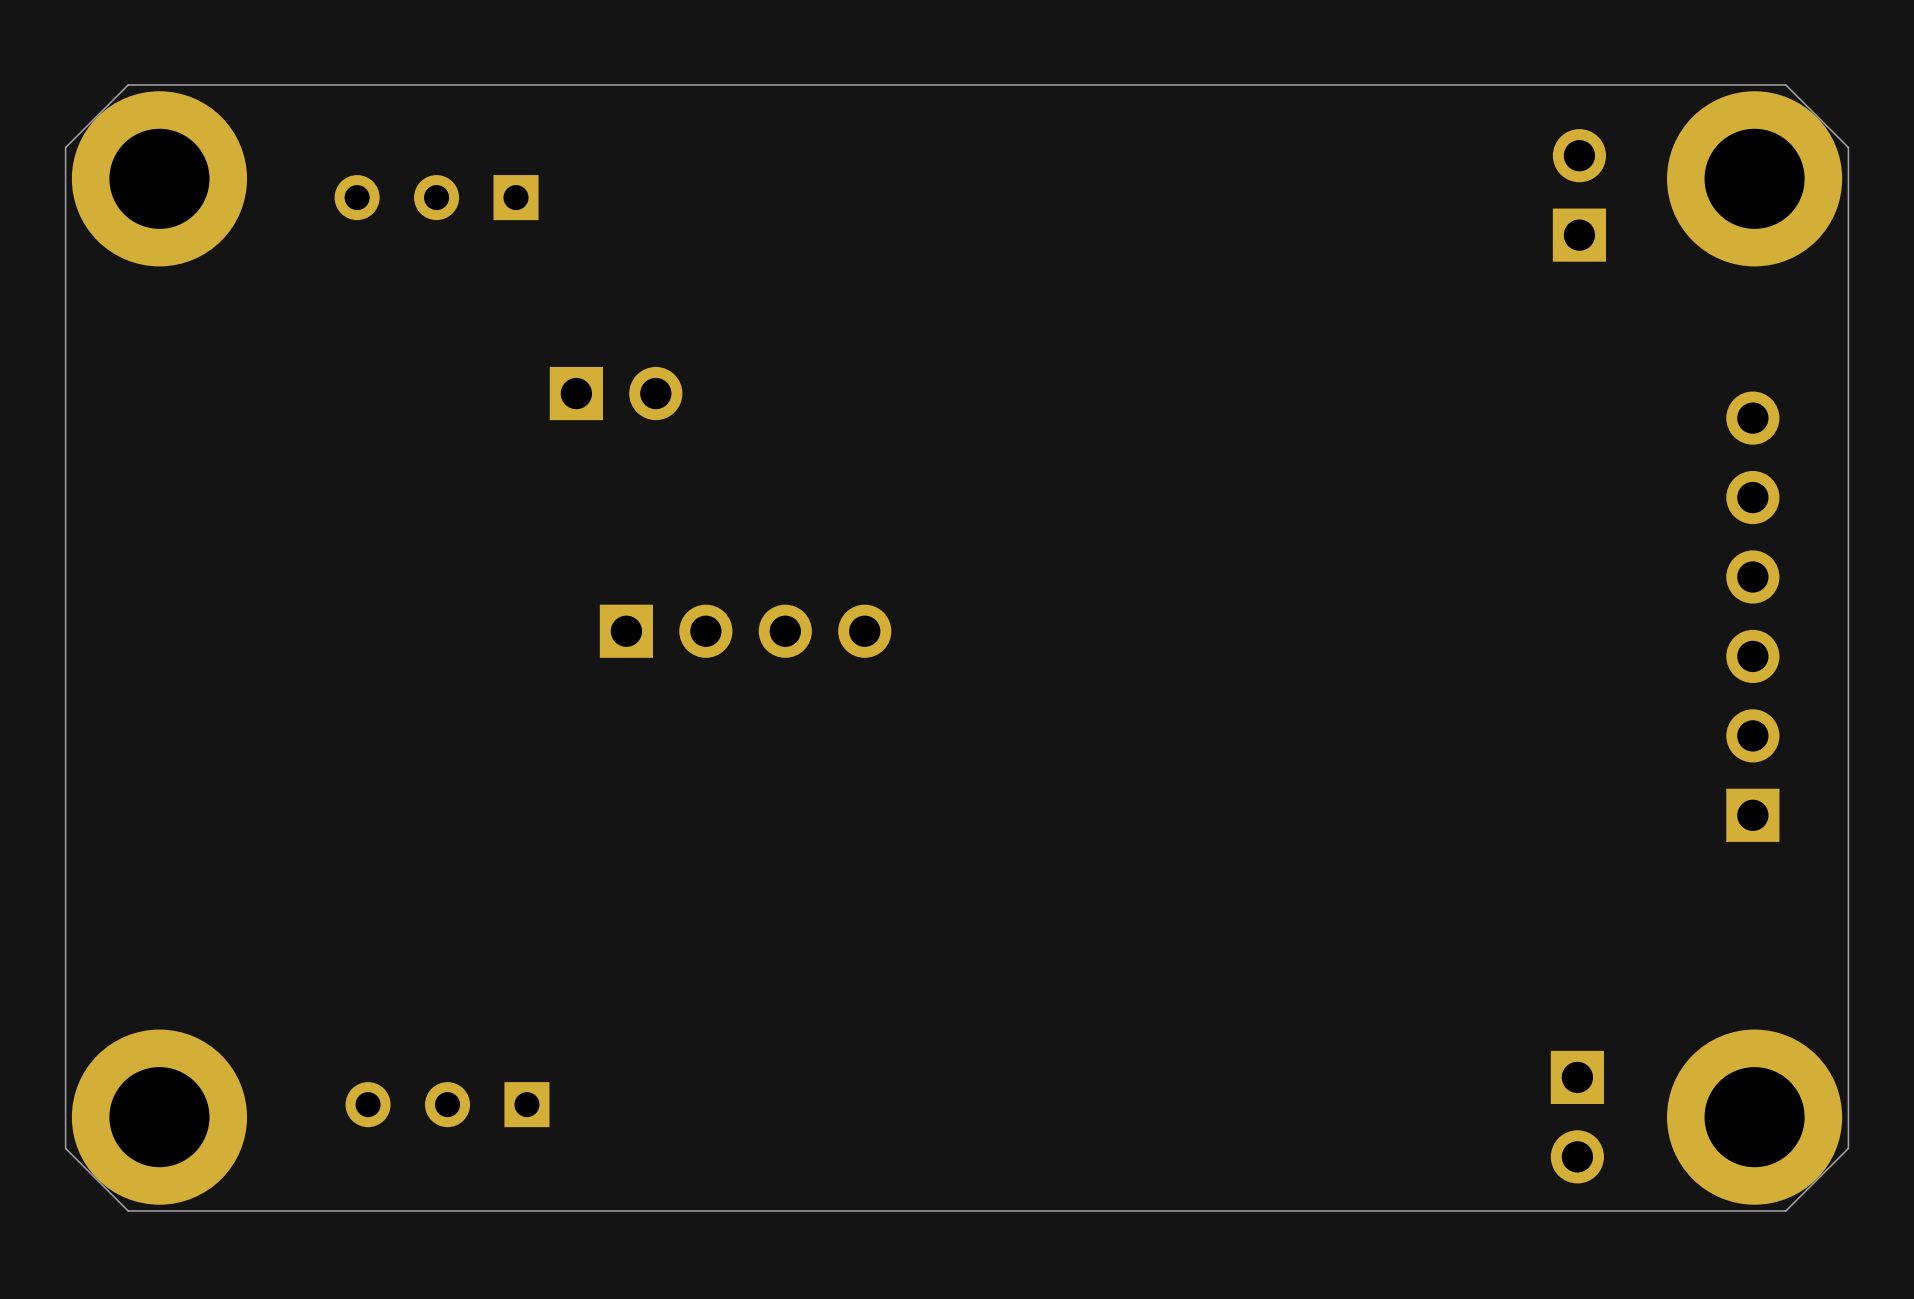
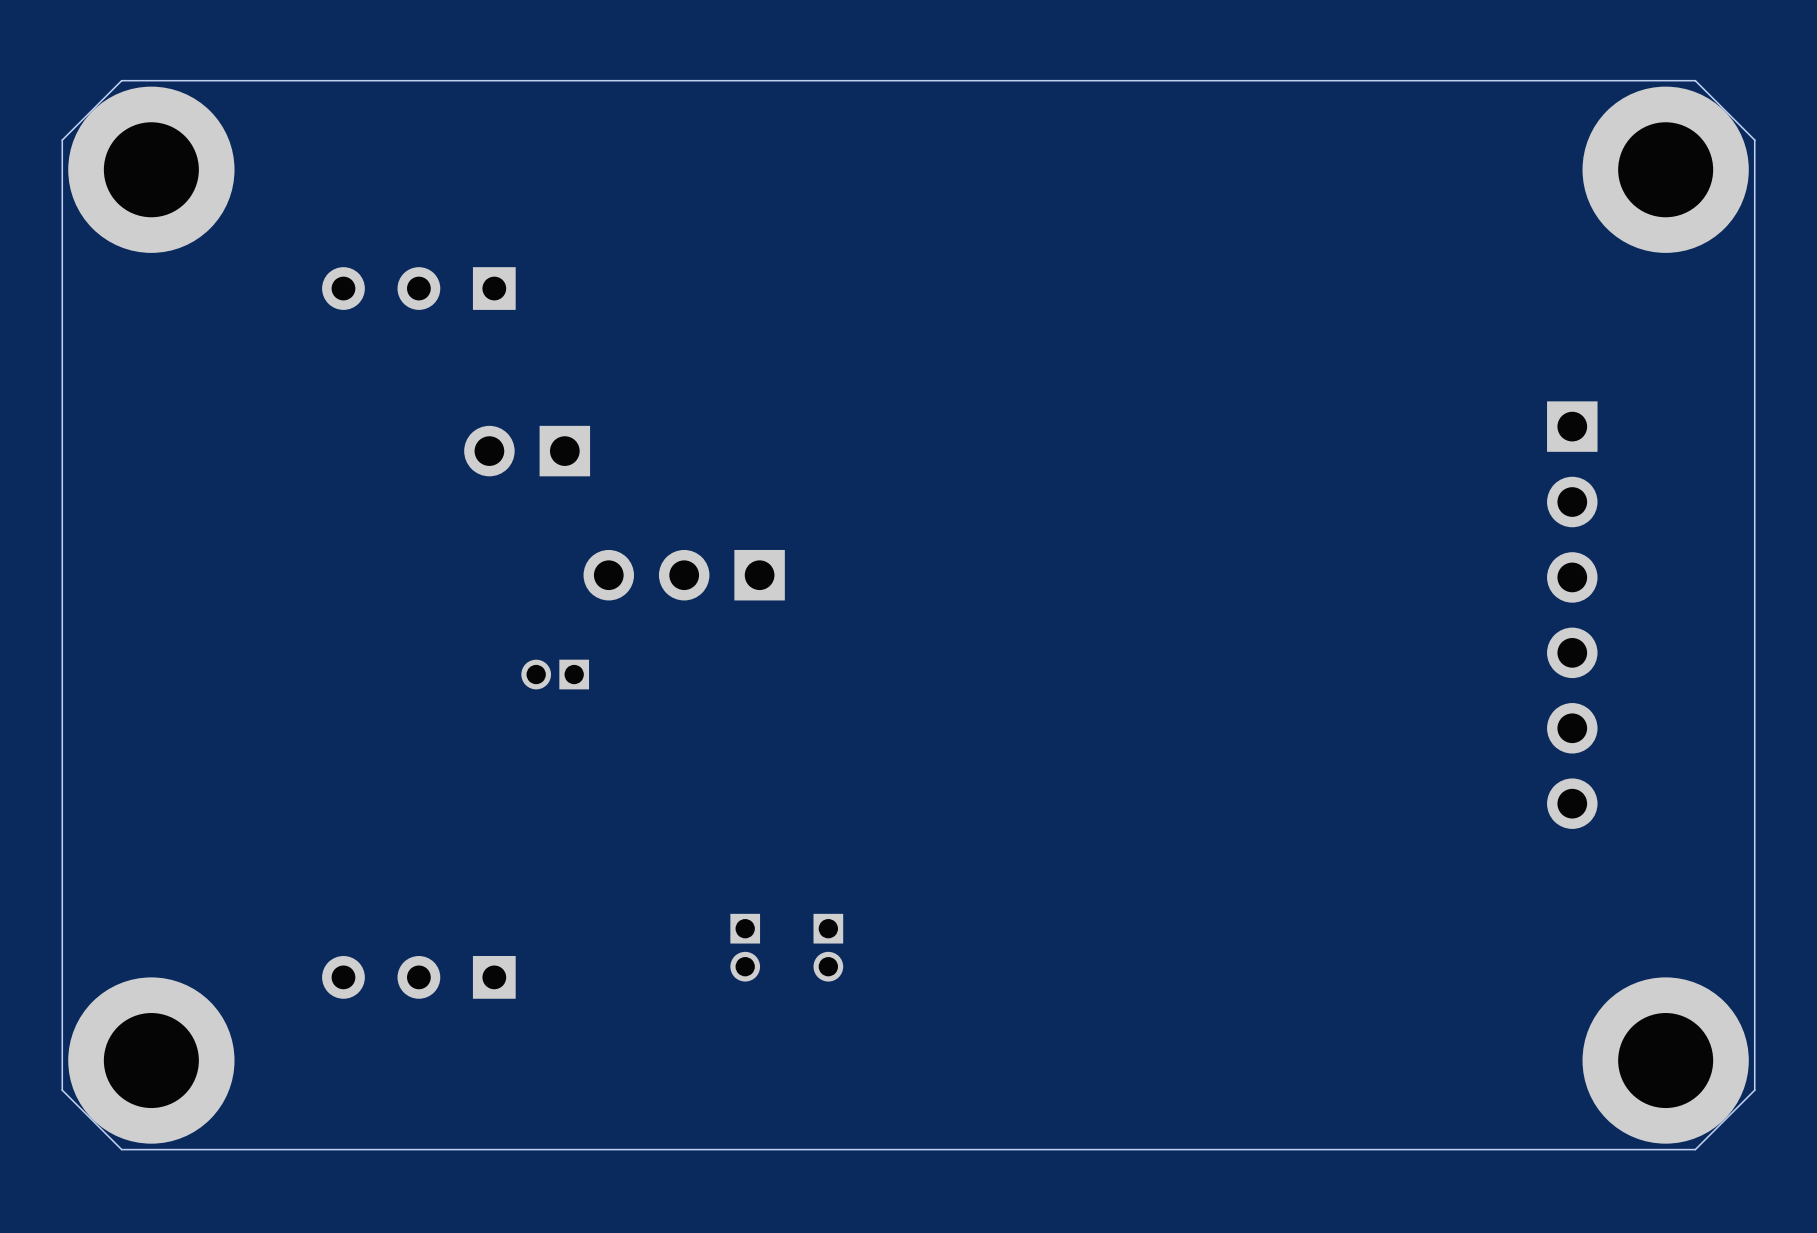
part: (1579, 195) -> none
part position: (436, 197) -> (418, 288)
part rotation: 0° (616, 393) -> 180° (527, 451)
part position: (616, 393) -> (527, 451)
part: none -> (684, 575)
part rotation: 0° (1752, 616) -> 180° (1572, 615)
part: (745, 631) -> none
part: none -> (555, 674)
part: none -> (745, 947)
part: none -> (828, 947)
part position: (447, 1104) -> (418, 977)
part: (1577, 1117) -> none

